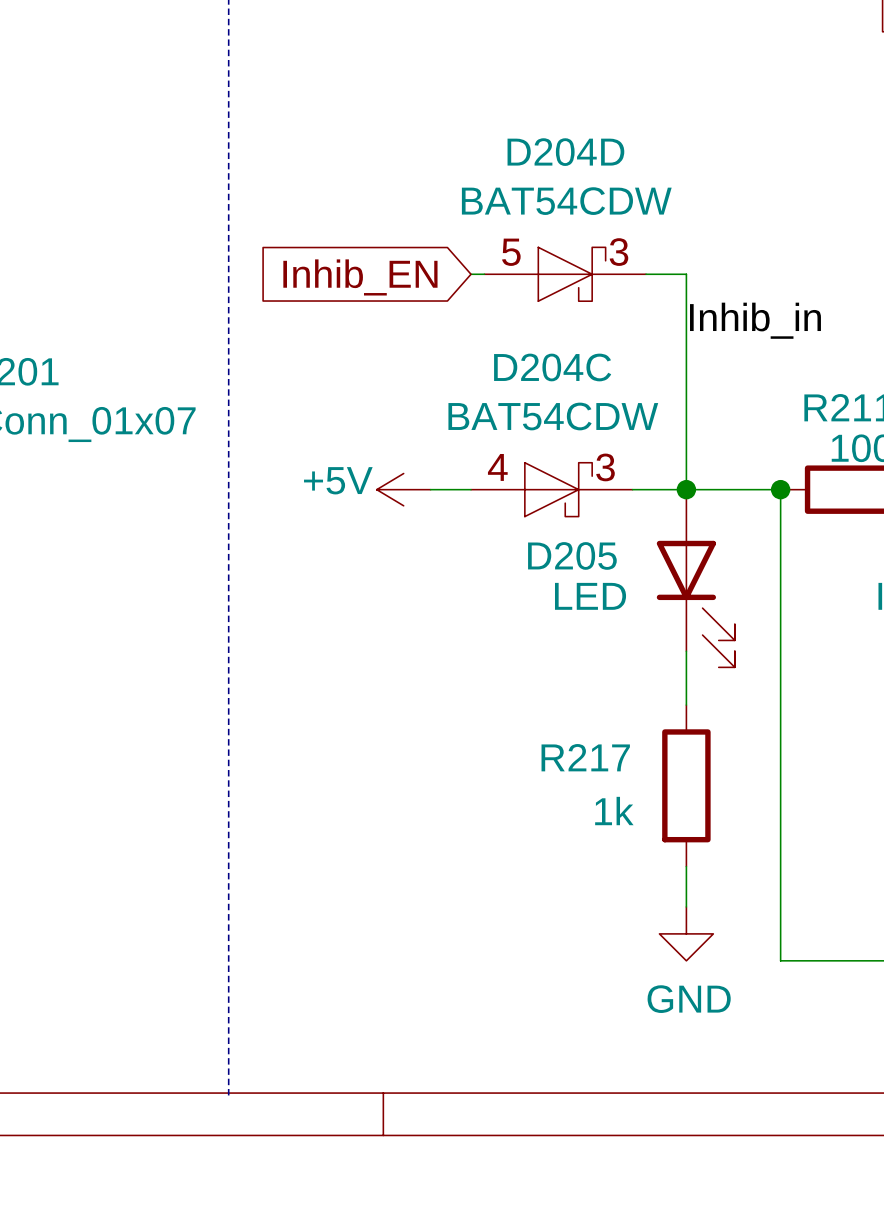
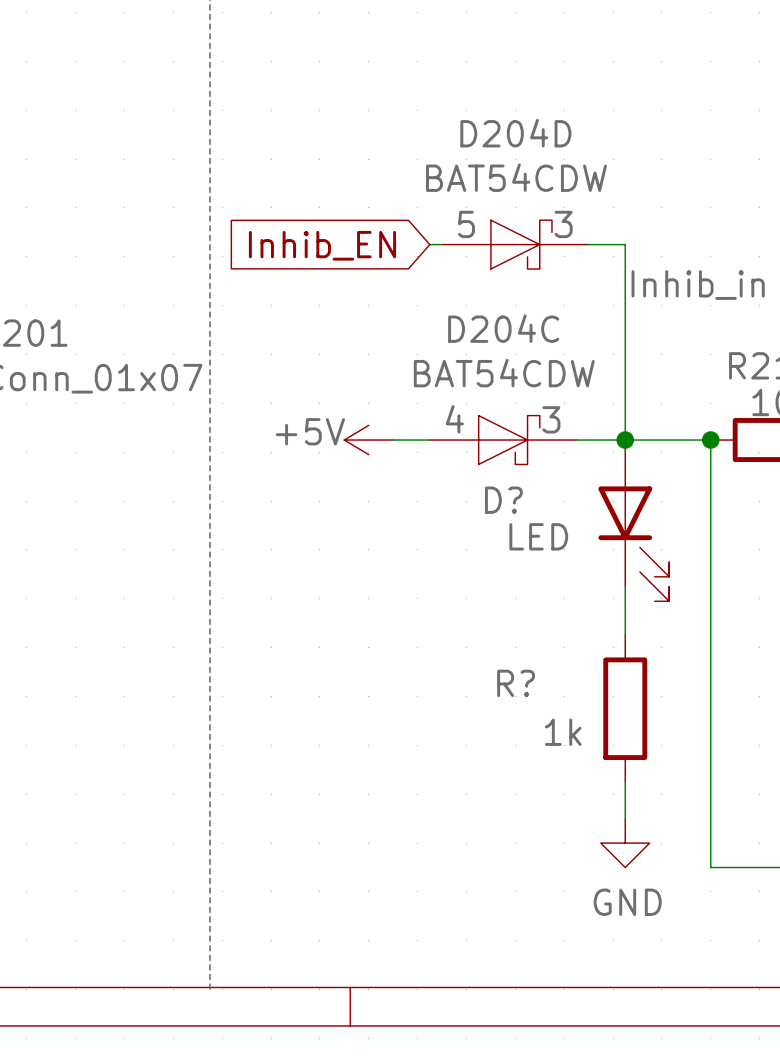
D205 name: D205 (572, 555) -> D? (503, 500)
R217 name: R217 (585, 757) -> R? (516, 683)

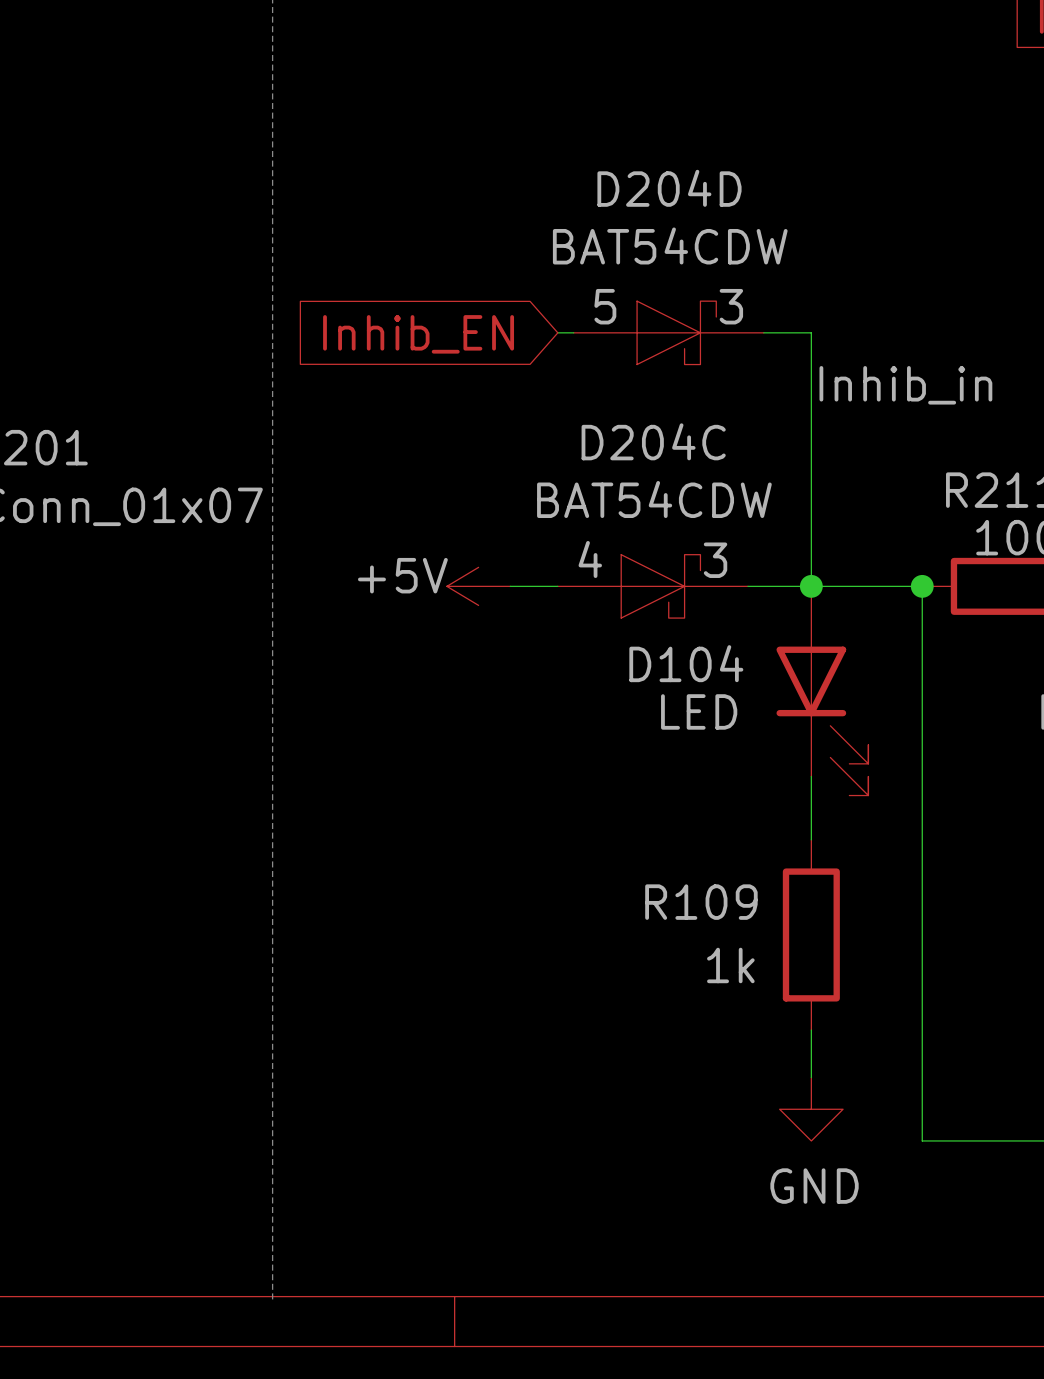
D? name: D? (503, 500) -> D104 (686, 663)
R? name: R? (516, 683) -> R109 (701, 902)

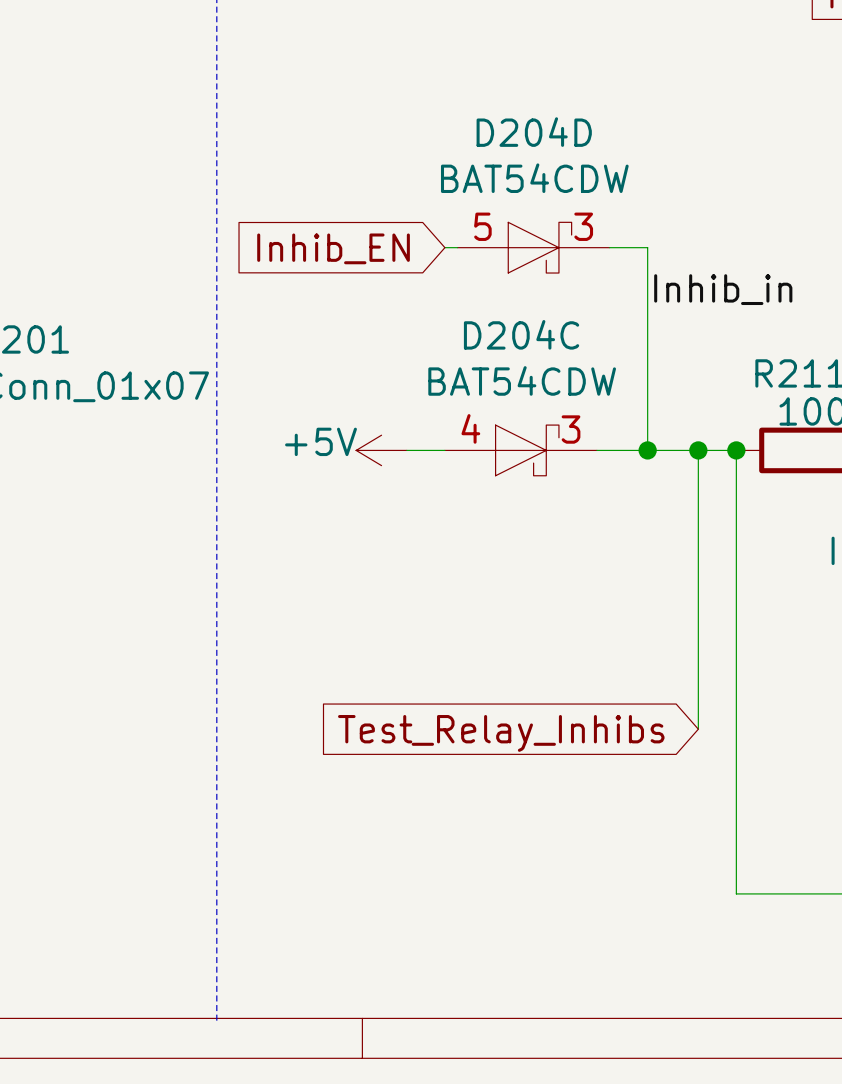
wire: none -> (698, 450) (698, 729)
junction: none -> (698, 450)
D104: LED (822, 690) -> none
wire: (811, 776) (811, 839) -> none
R109: 1k (811, 934) -> none
global label: none -> Test_Relay_Inhibs (501, 733)
wire: (811, 1030) (811, 1077) -> none
power symbol: GND (811, 1109) -> none

